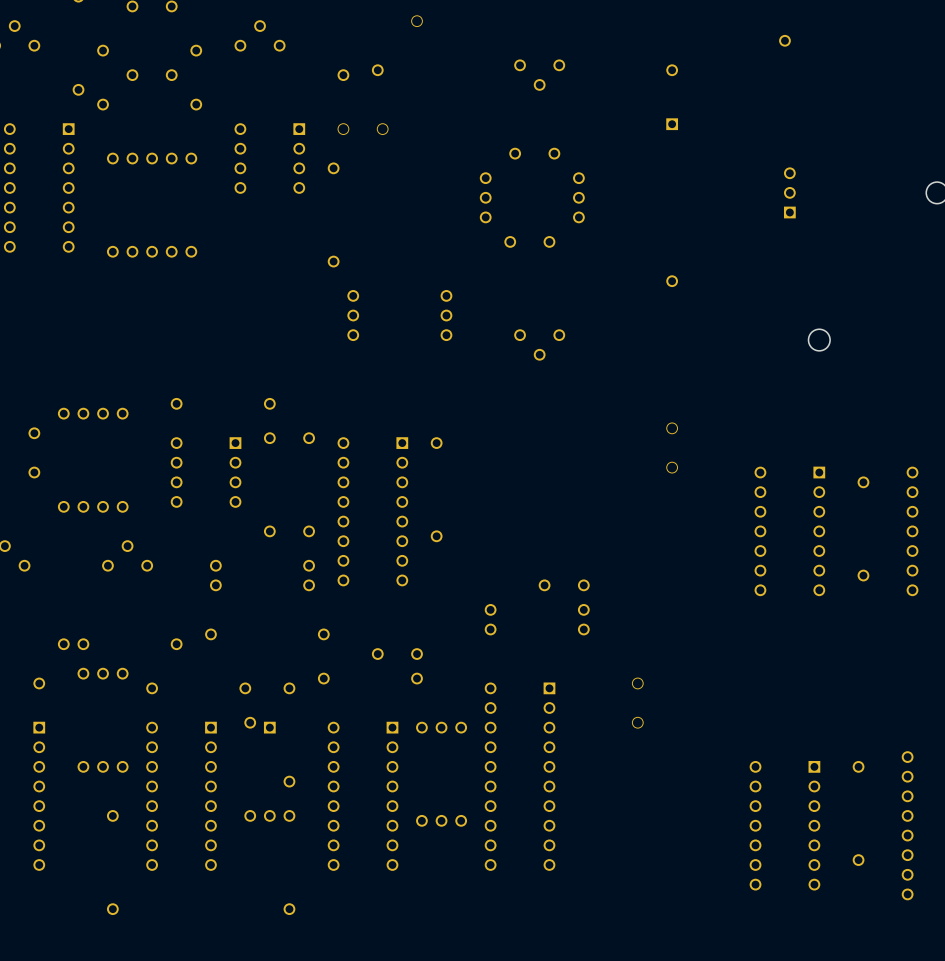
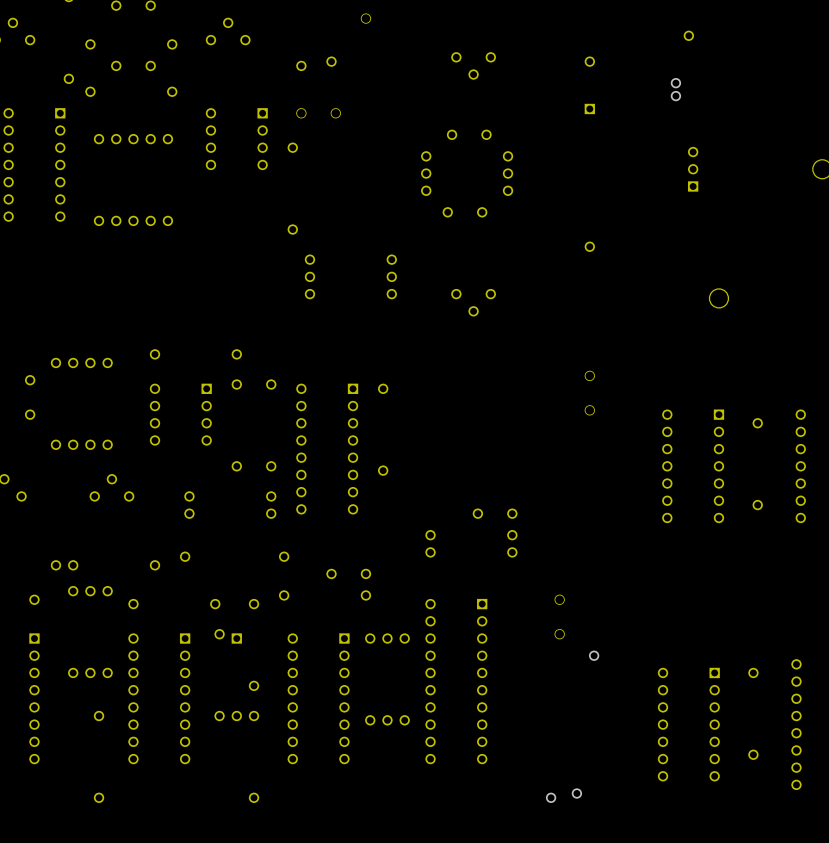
via: none -> (675, 83)
via: none -> (675, 96)
via: none -> (594, 655)
via: none -> (576, 793)
via: none -> (551, 797)

